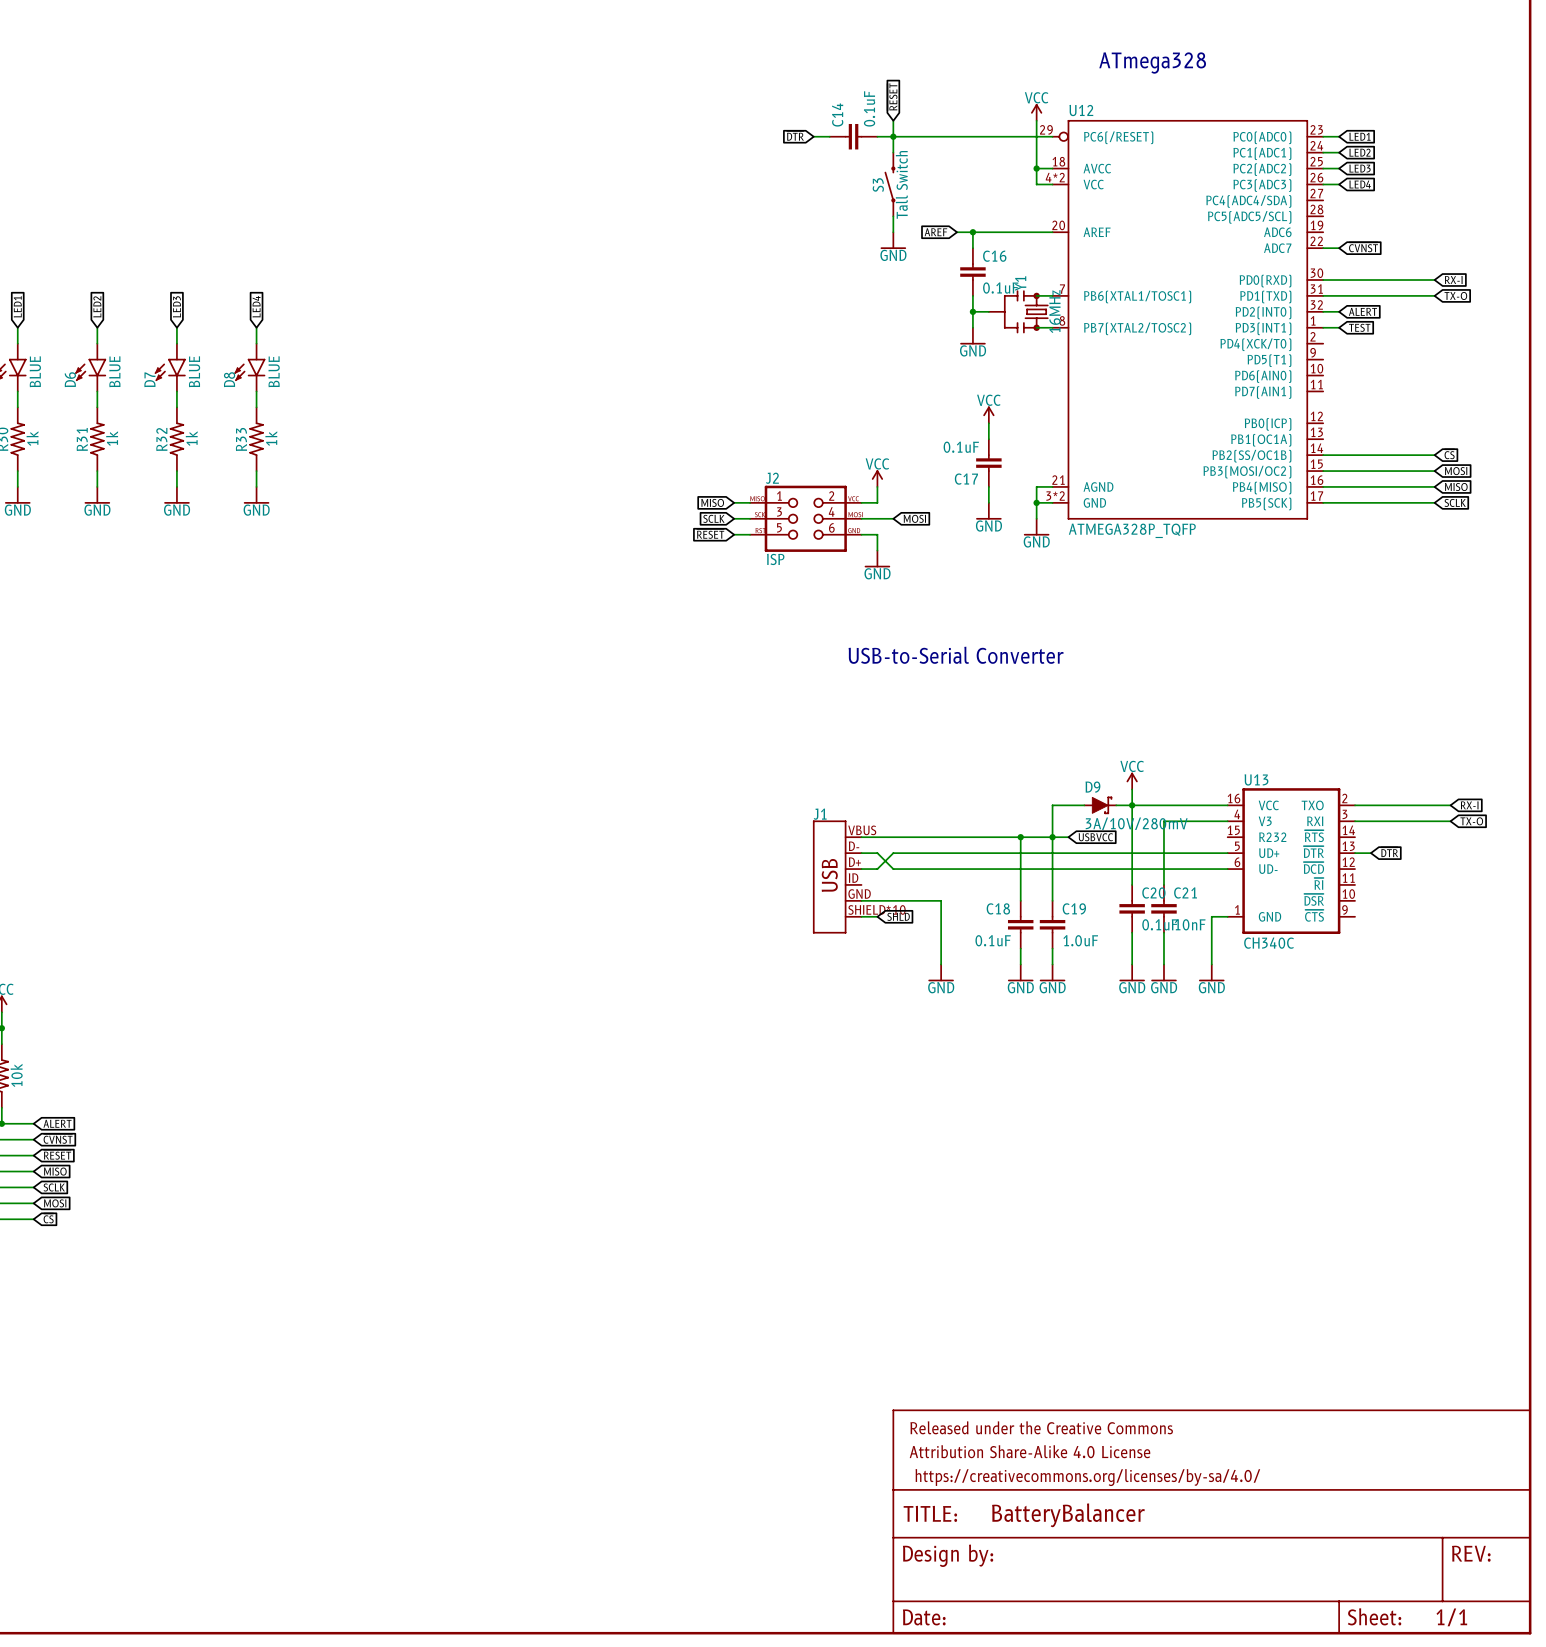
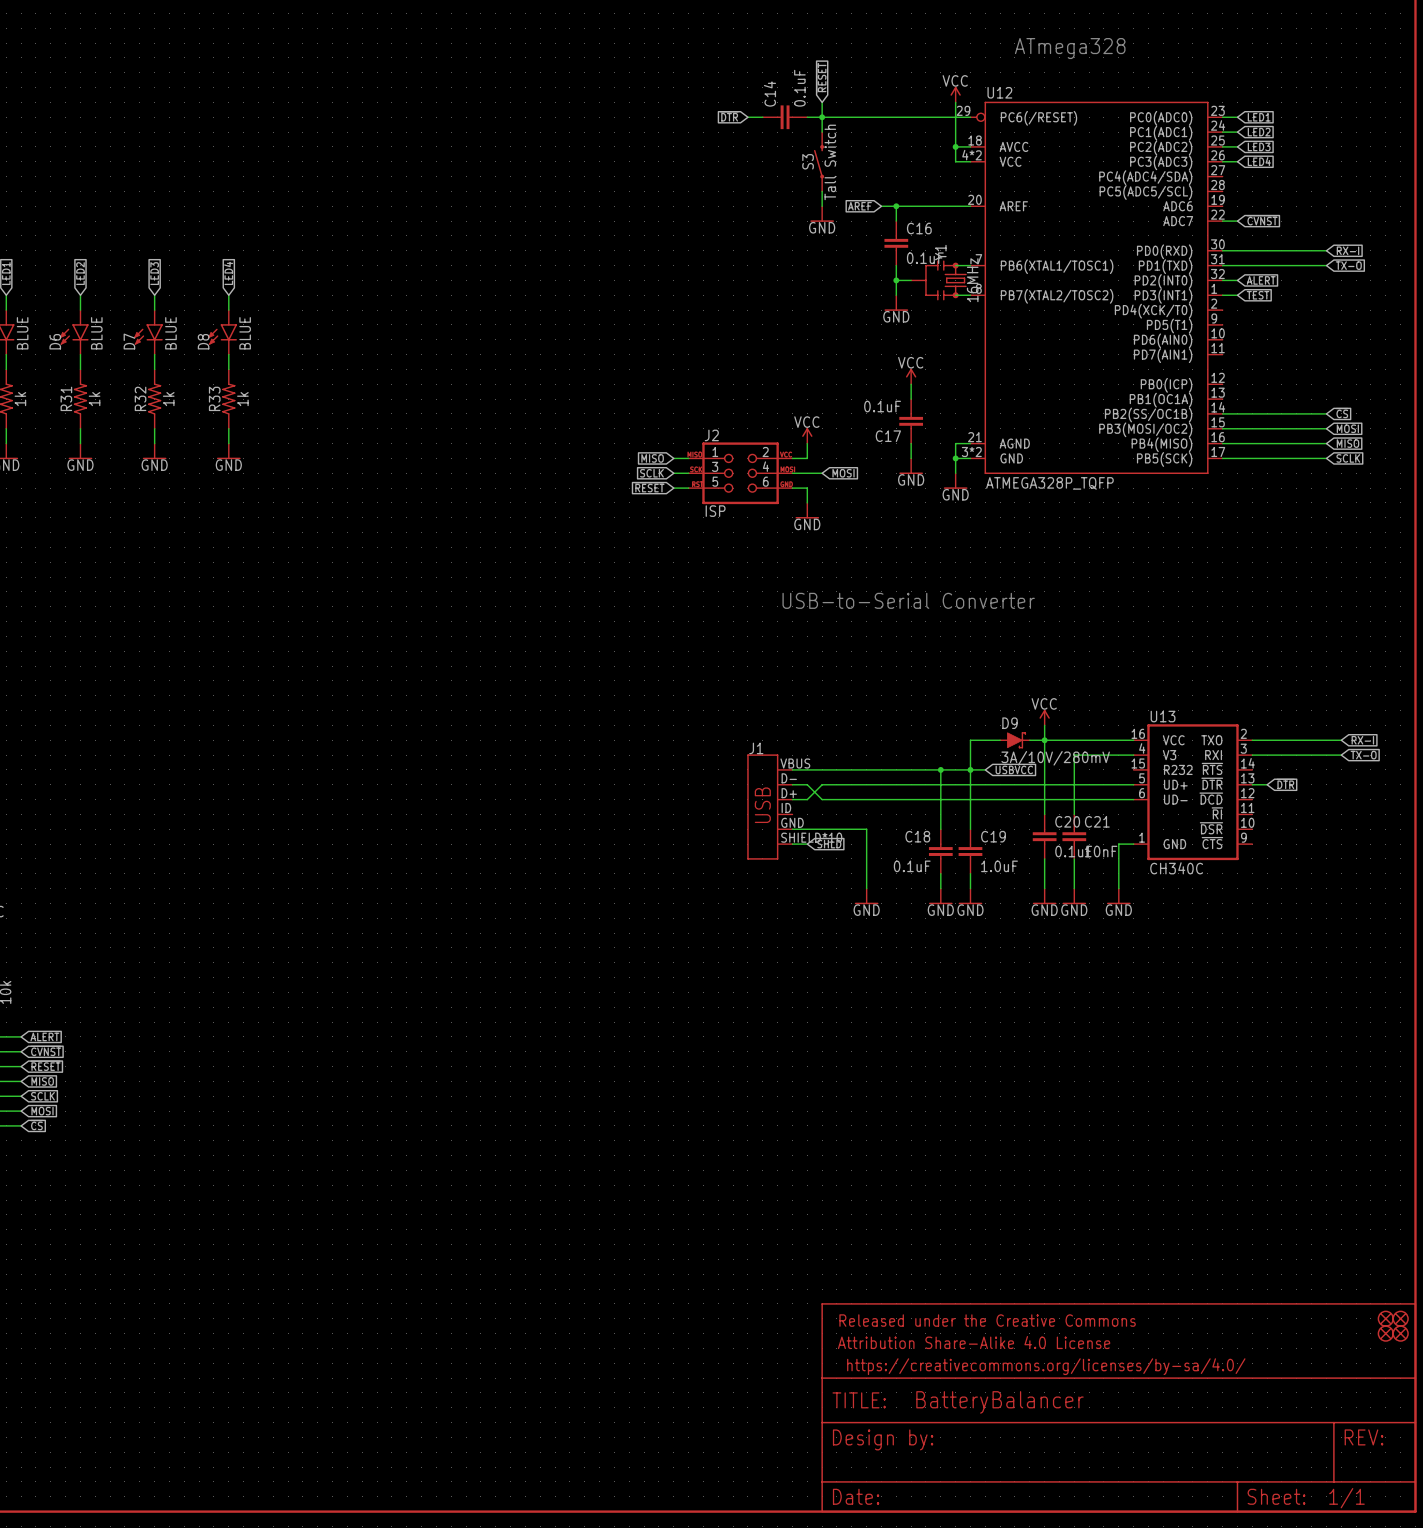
part: none -> (1385, 1318)
part: none -> (1400, 1318)
part: none -> (1385, 1333)
part: none -> (1400, 1333)

